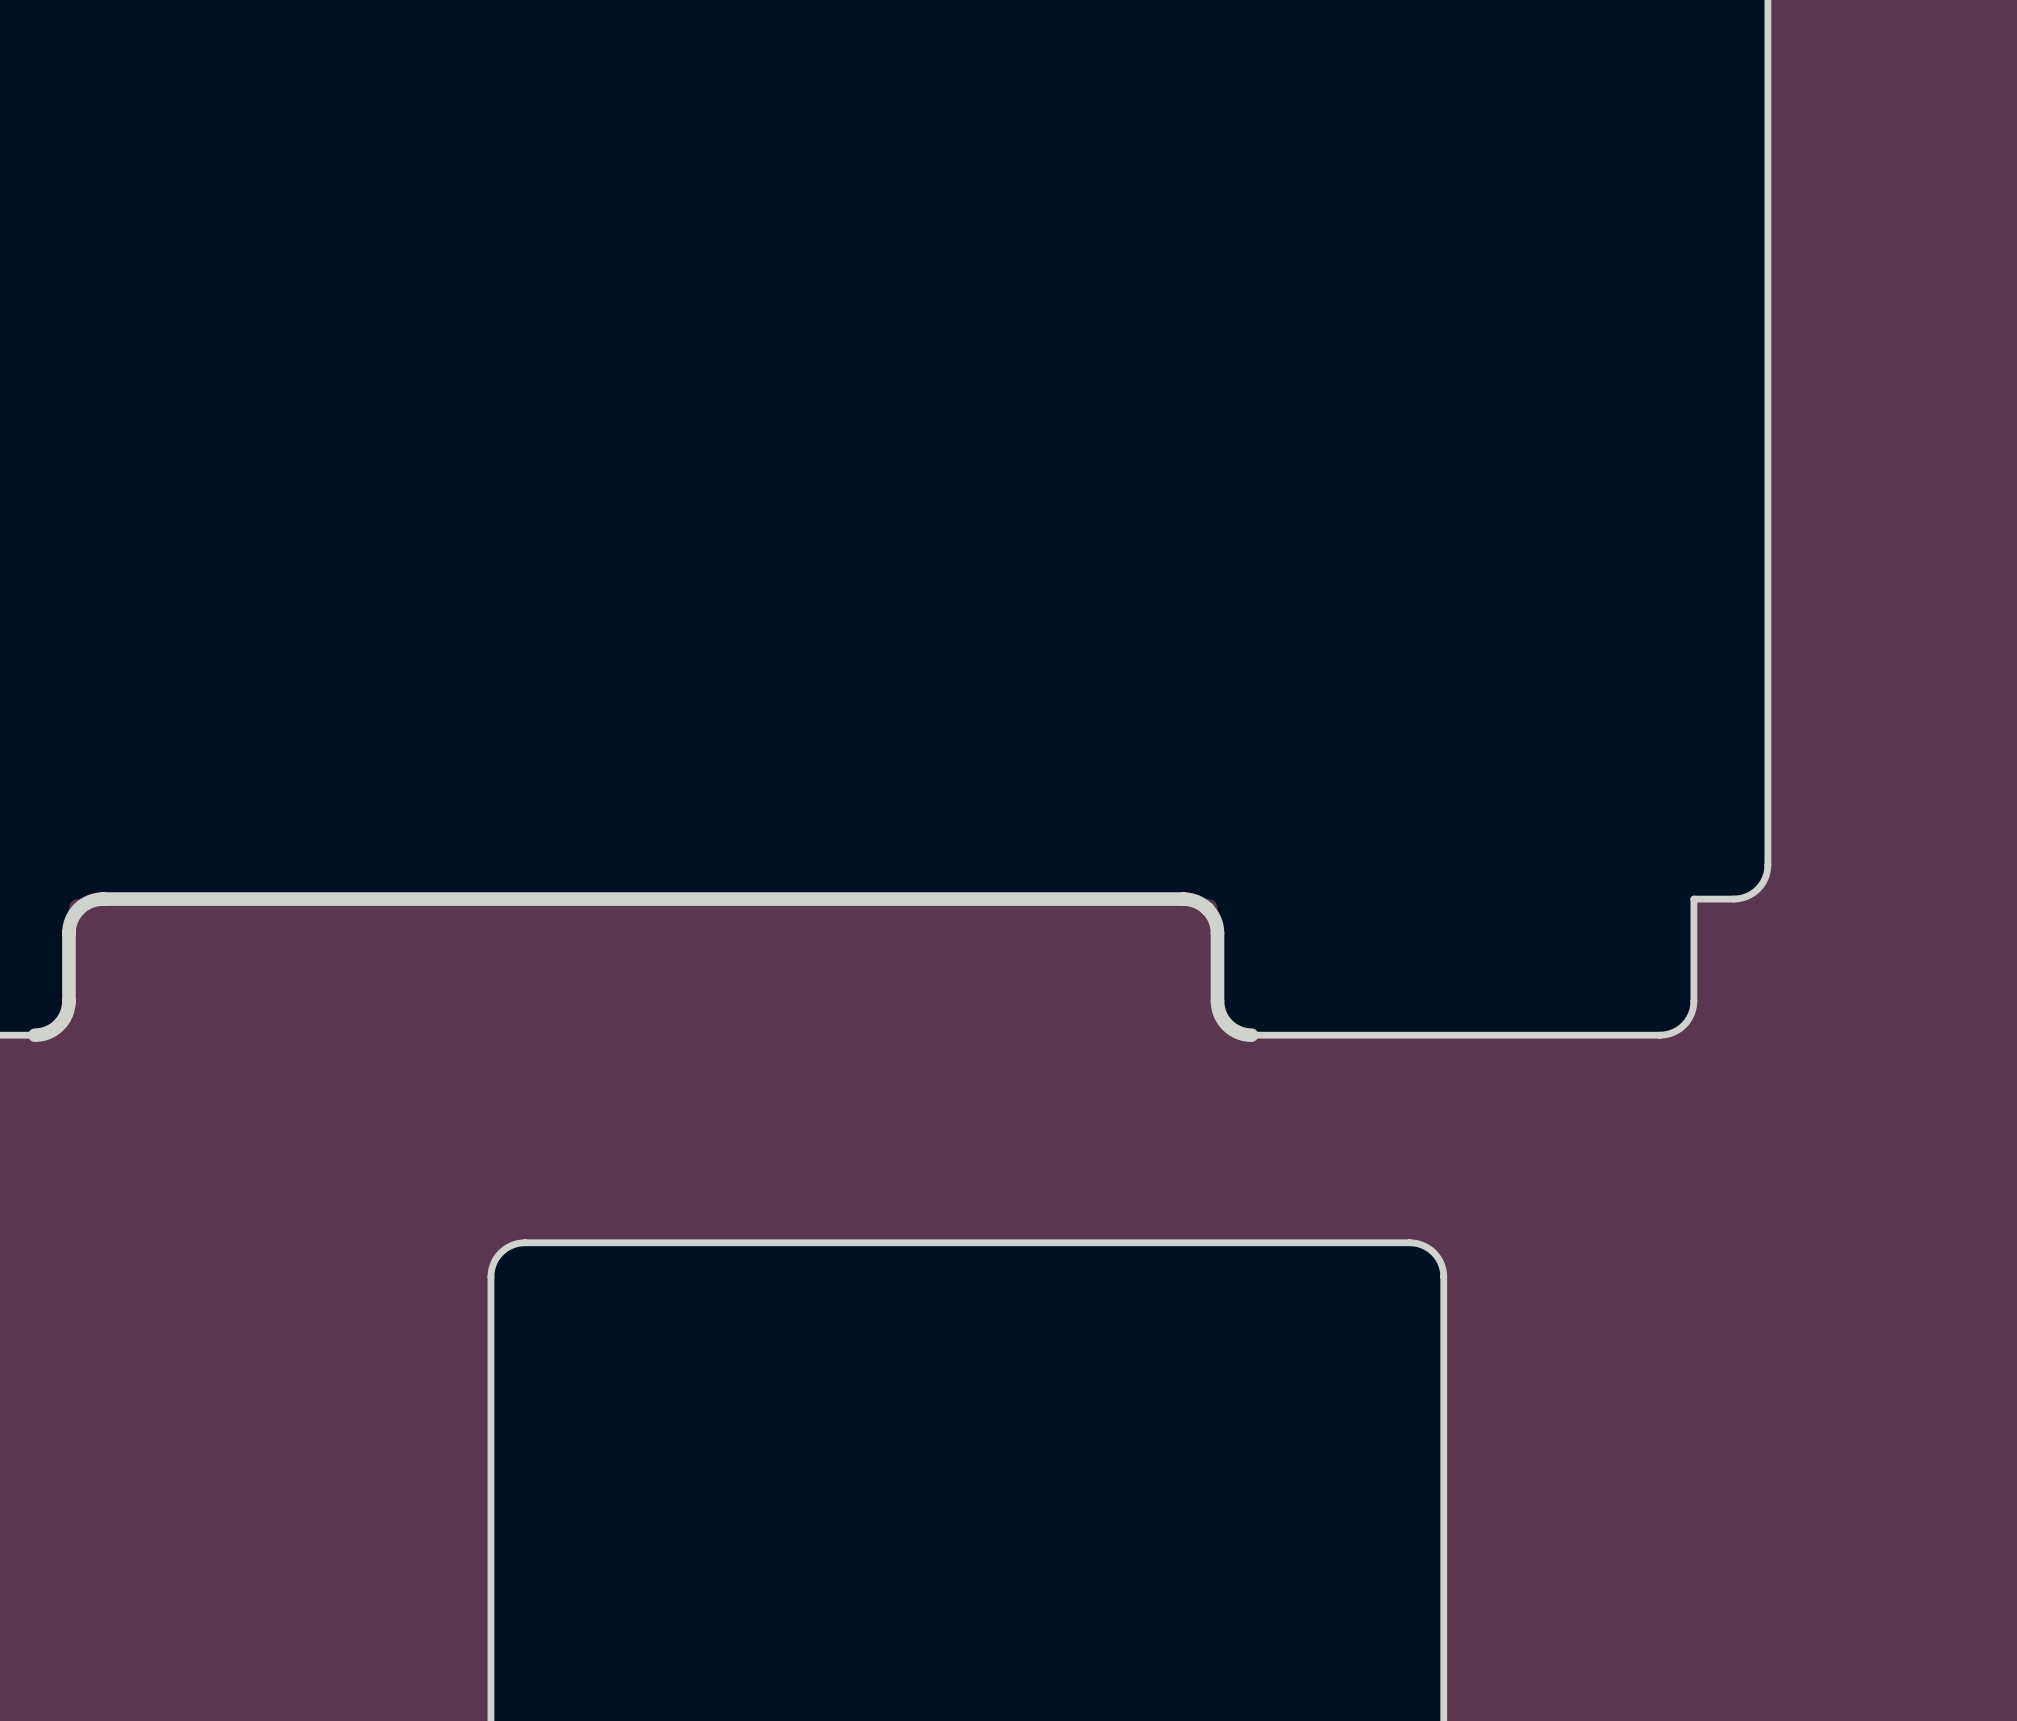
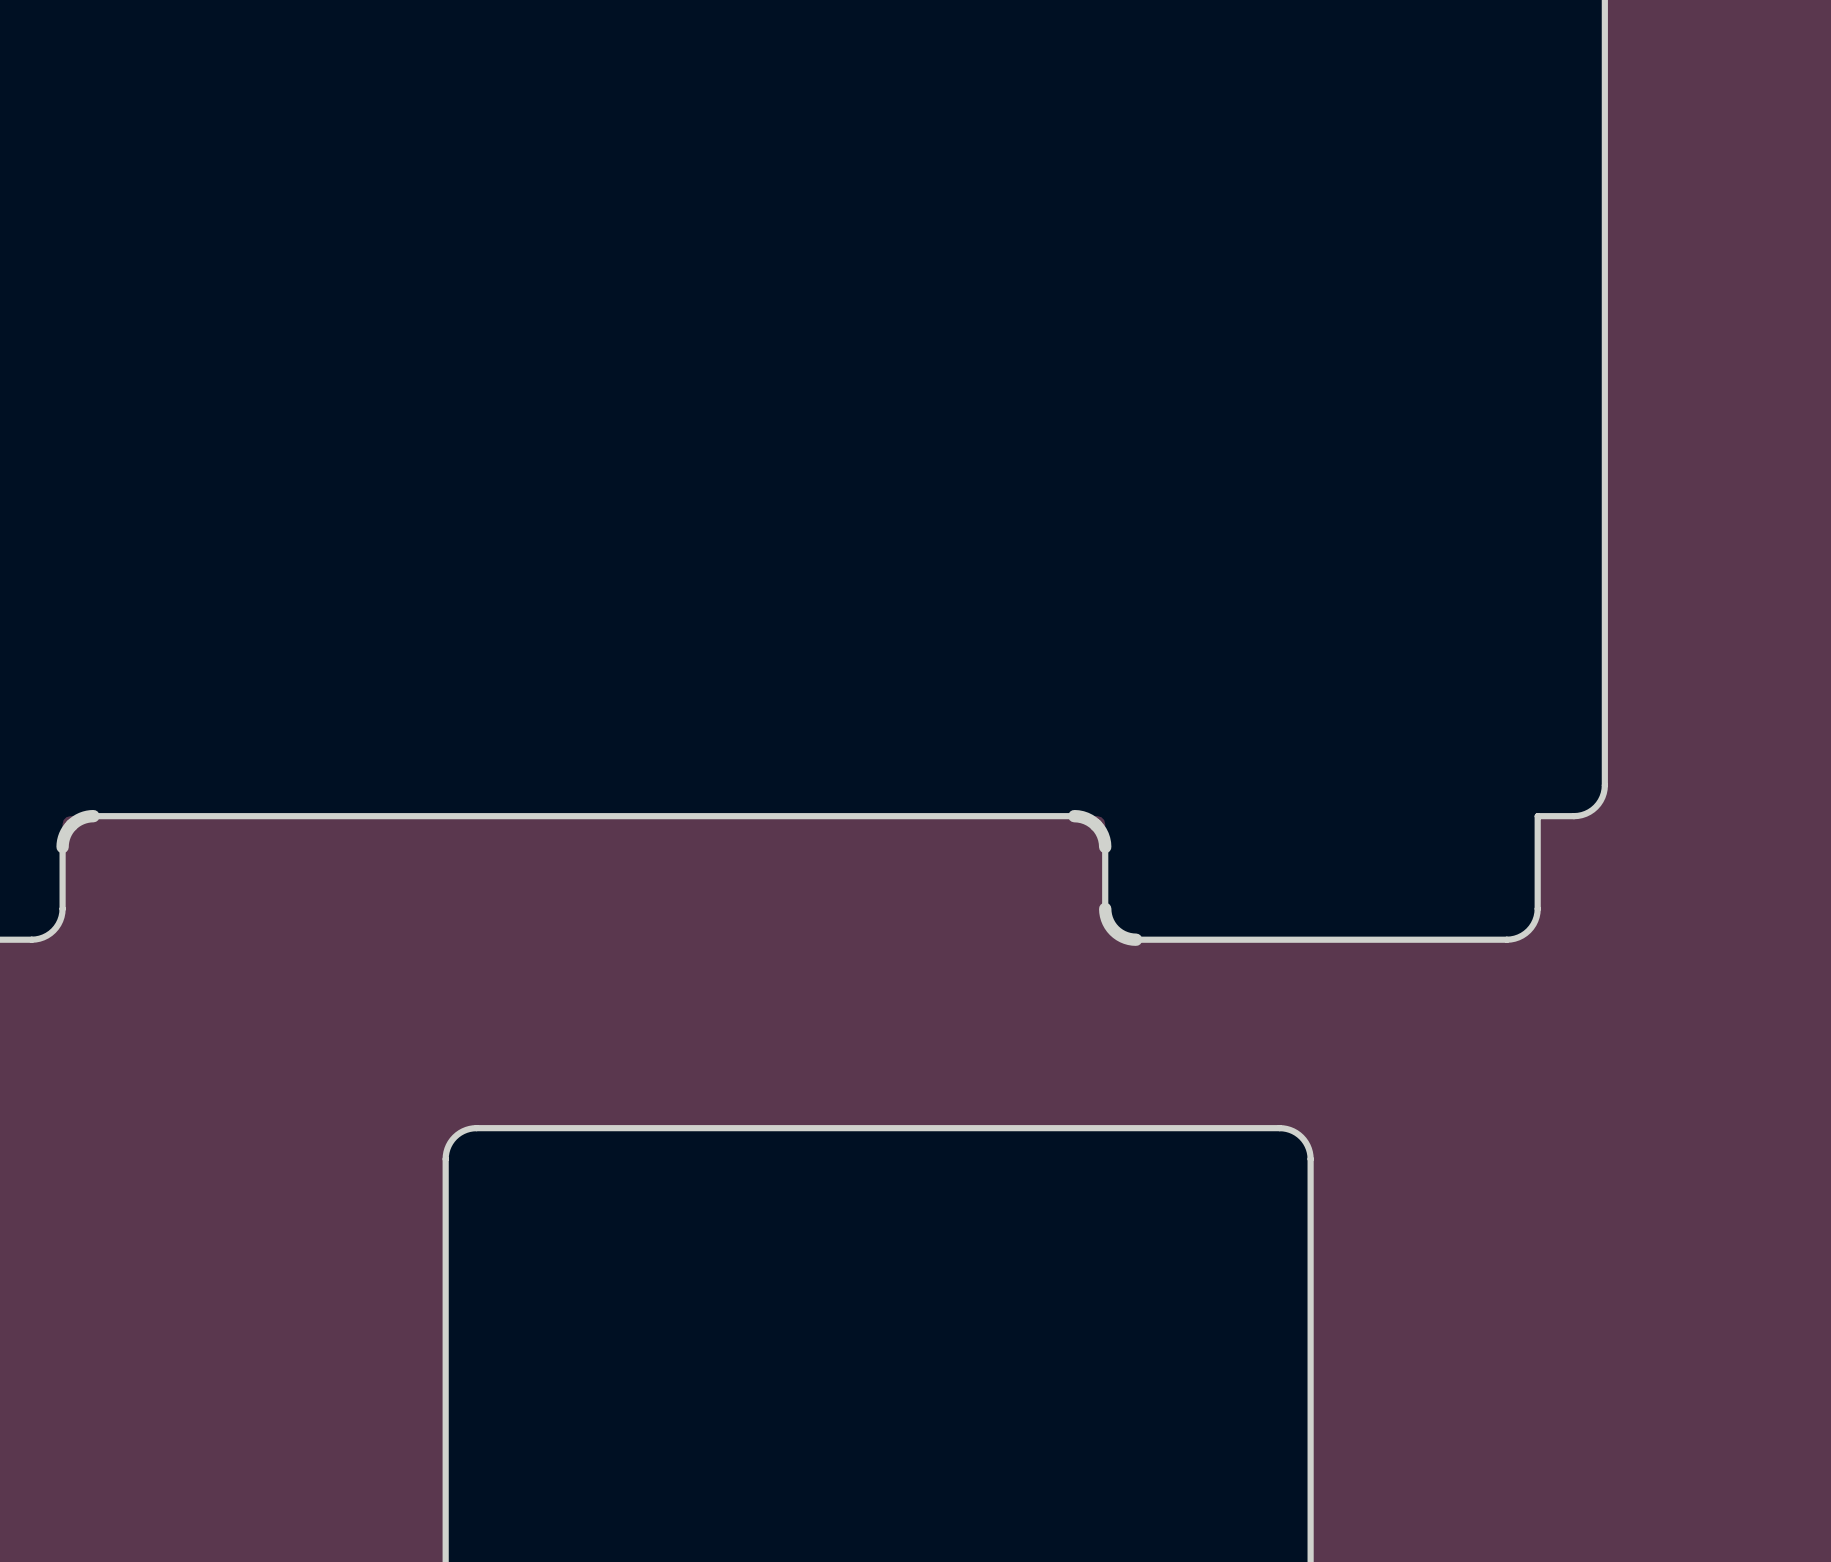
board edge width: thick (102, 899) (1183, 899) -> thin (93, 816) (1074, 816)
board edge width: thick (68, 933) (67, 1009) (61, 1021) (55, 1028) (43, 1034) (34, 1035) -> thin (62, 847) (61, 916) (56, 927) (50, 933) (39, 938) (31, 939)
board edge width: thick (1217, 933) (1217, 1001) -> thin (1105, 847) (1105, 908)

